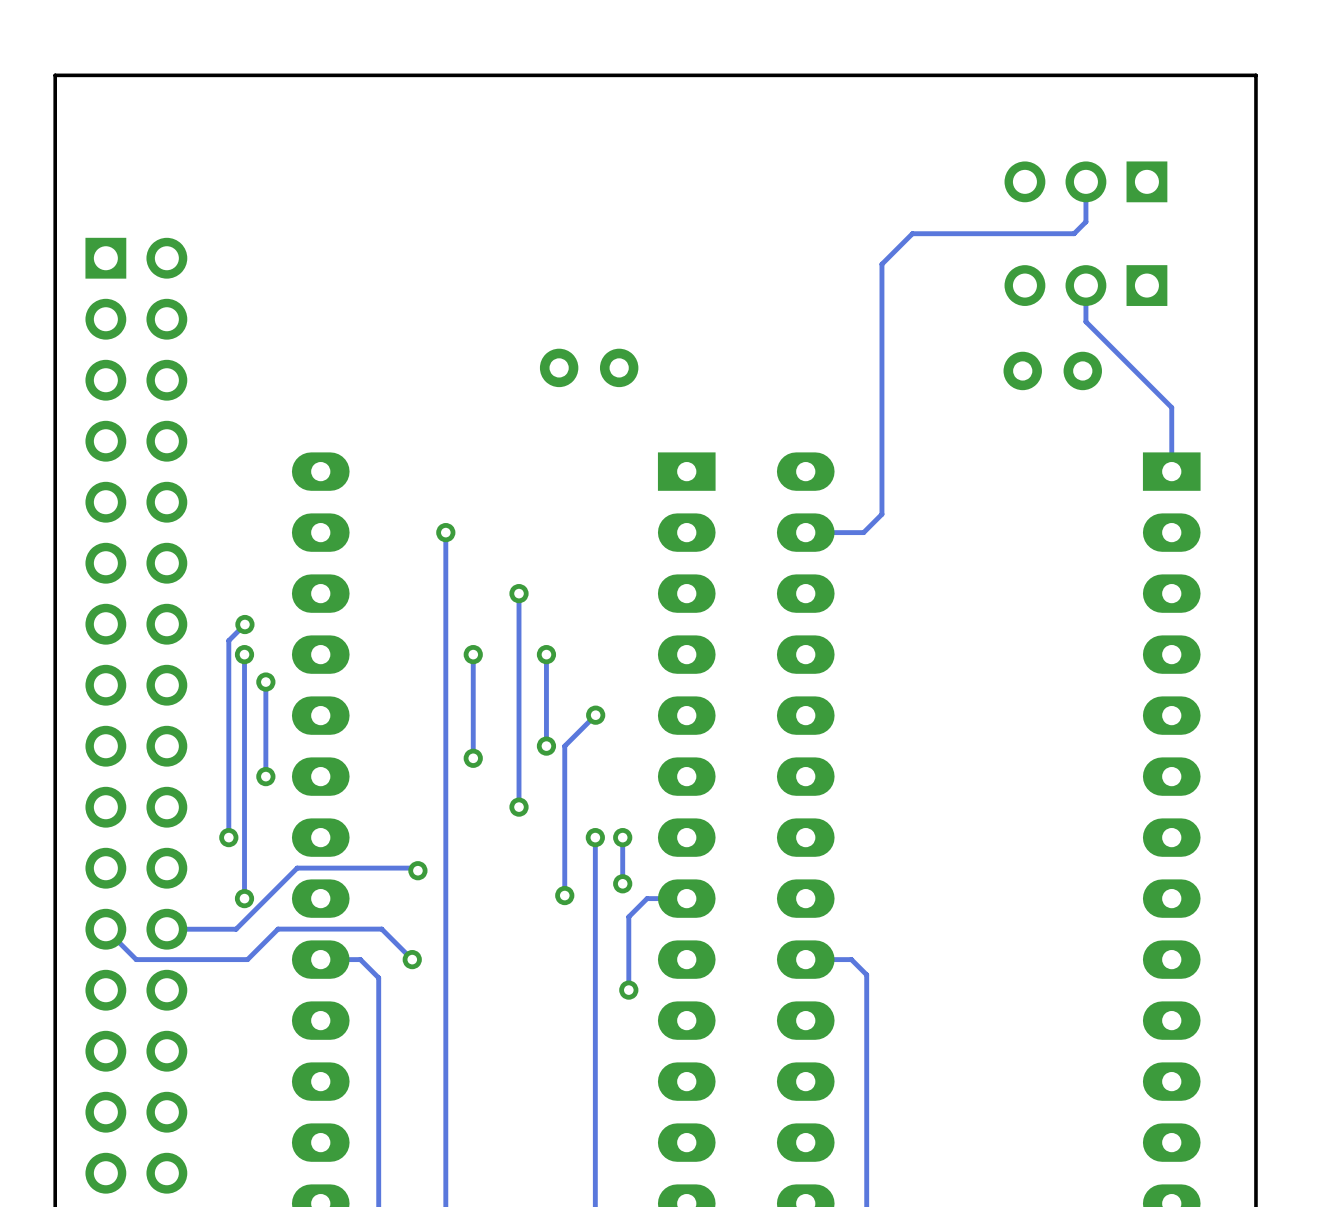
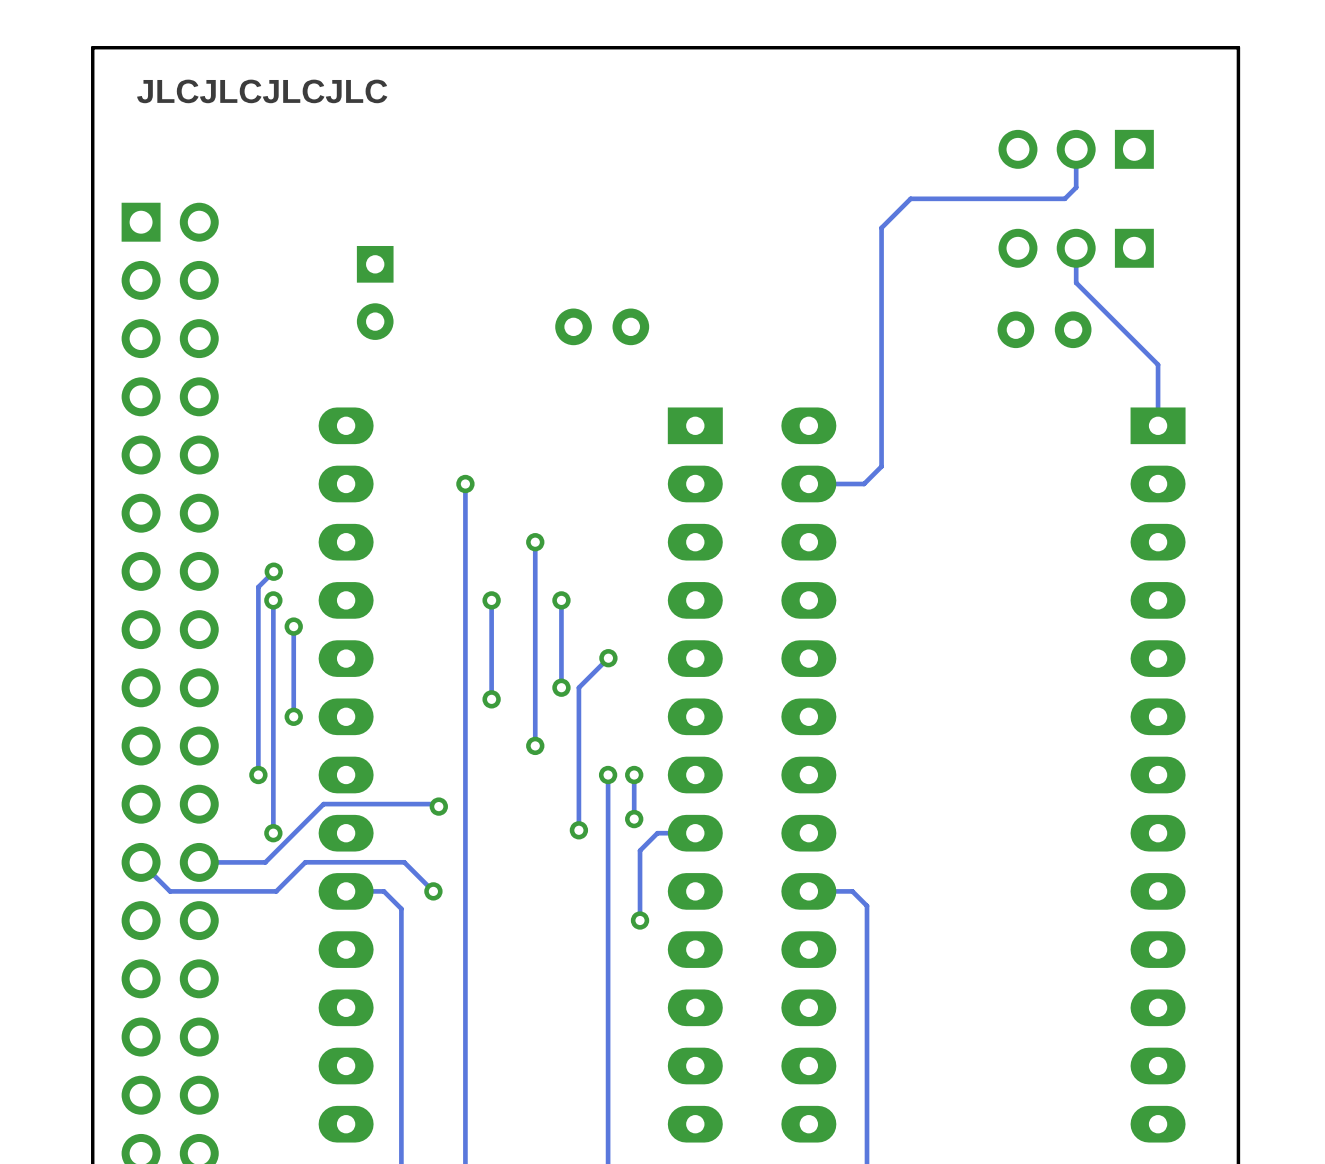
text: none -> JLCJLCJLCJLC (262, 91)
part: none -> (375, 292)

